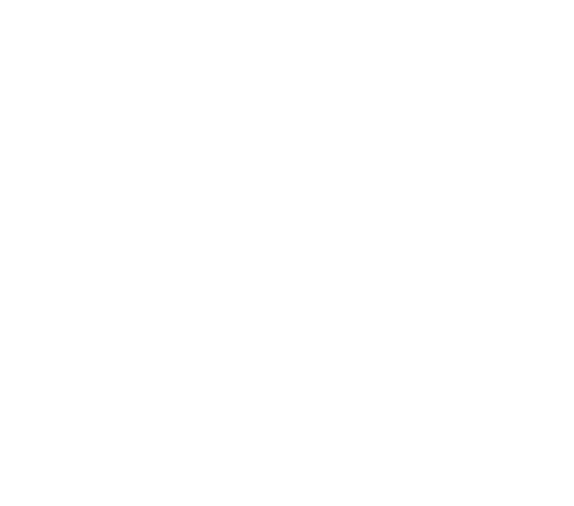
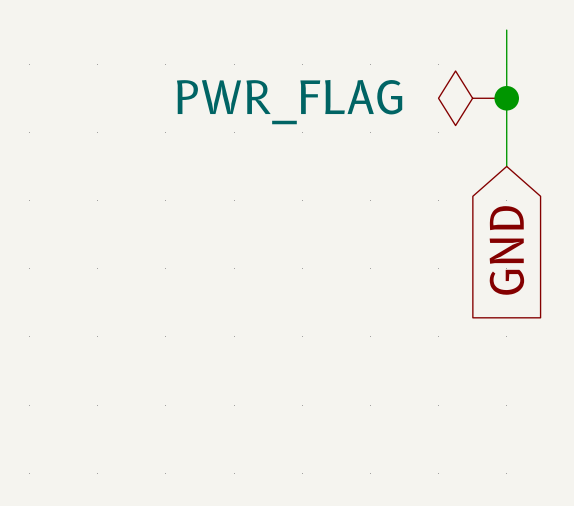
wire: none -> (506, 30) (506, 166)
power symbol: none -> PWR_FLAG (472, 98)
junction: none -> (506, 98)
global label: none -> GND (506, 250)

